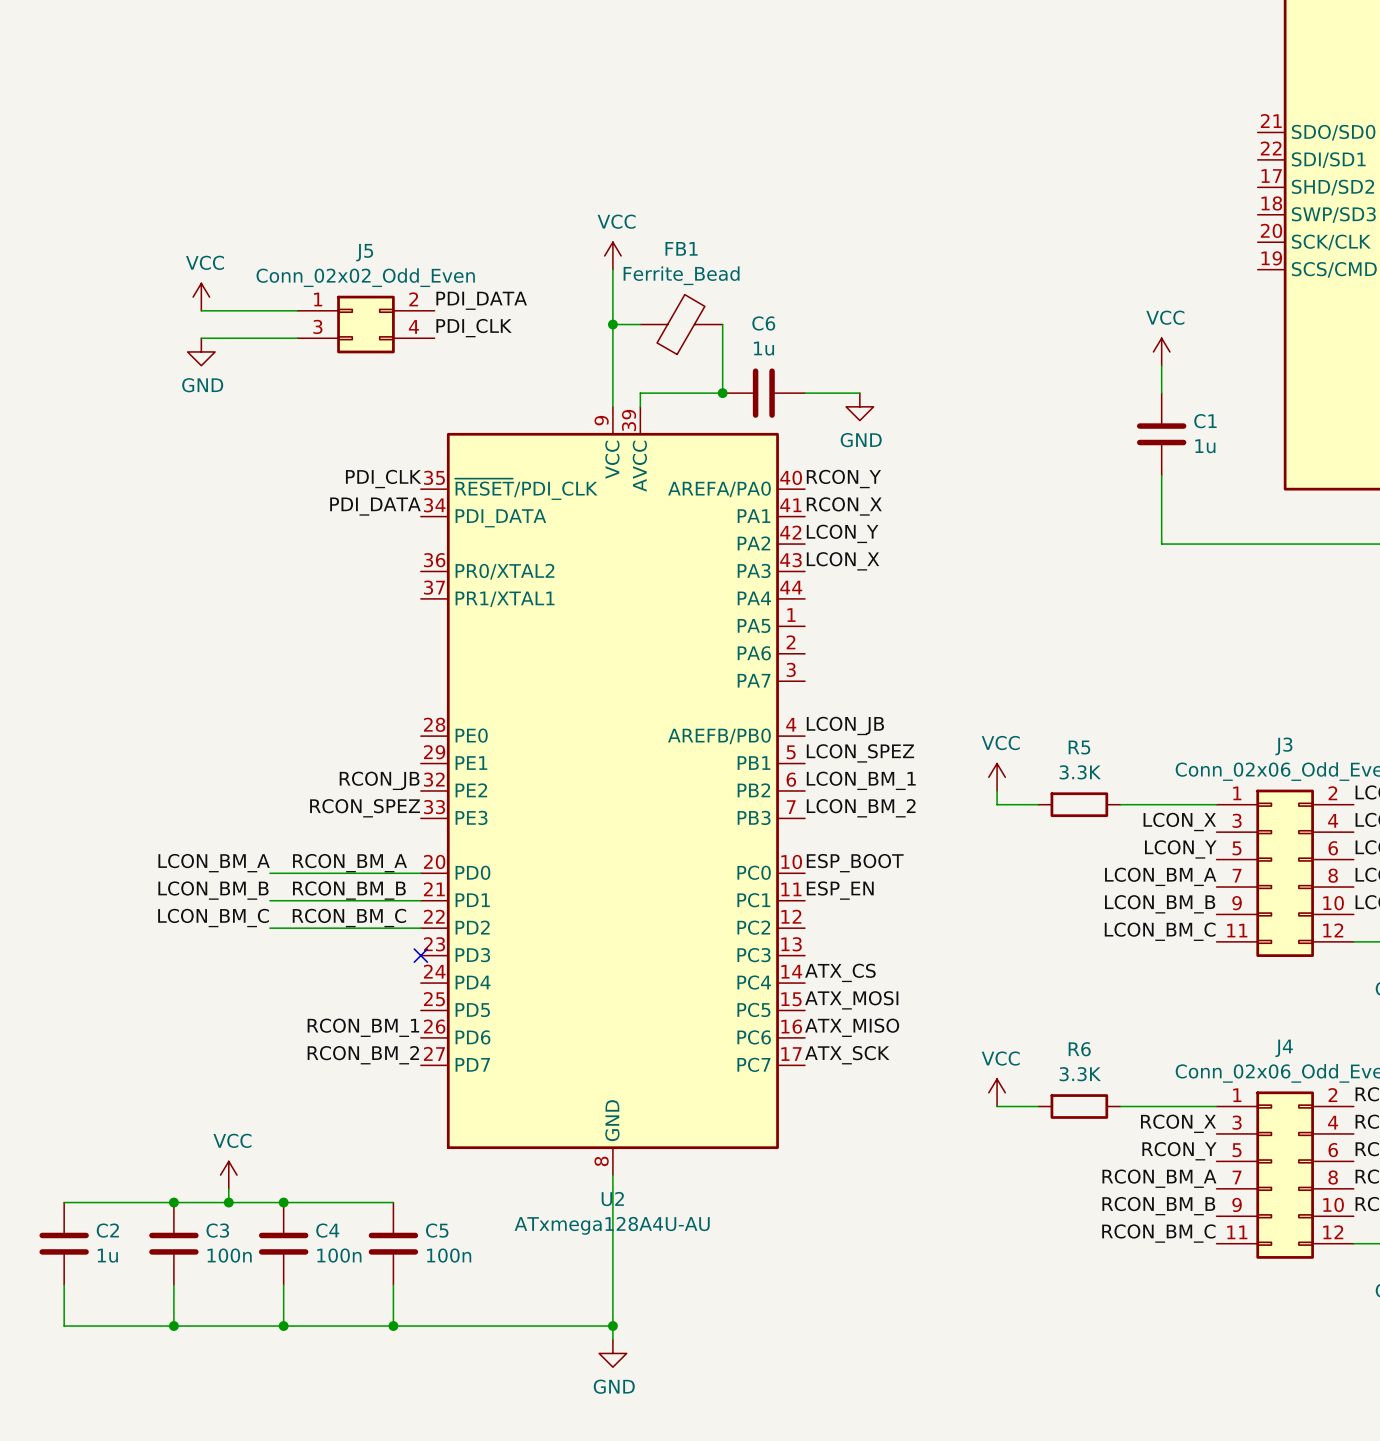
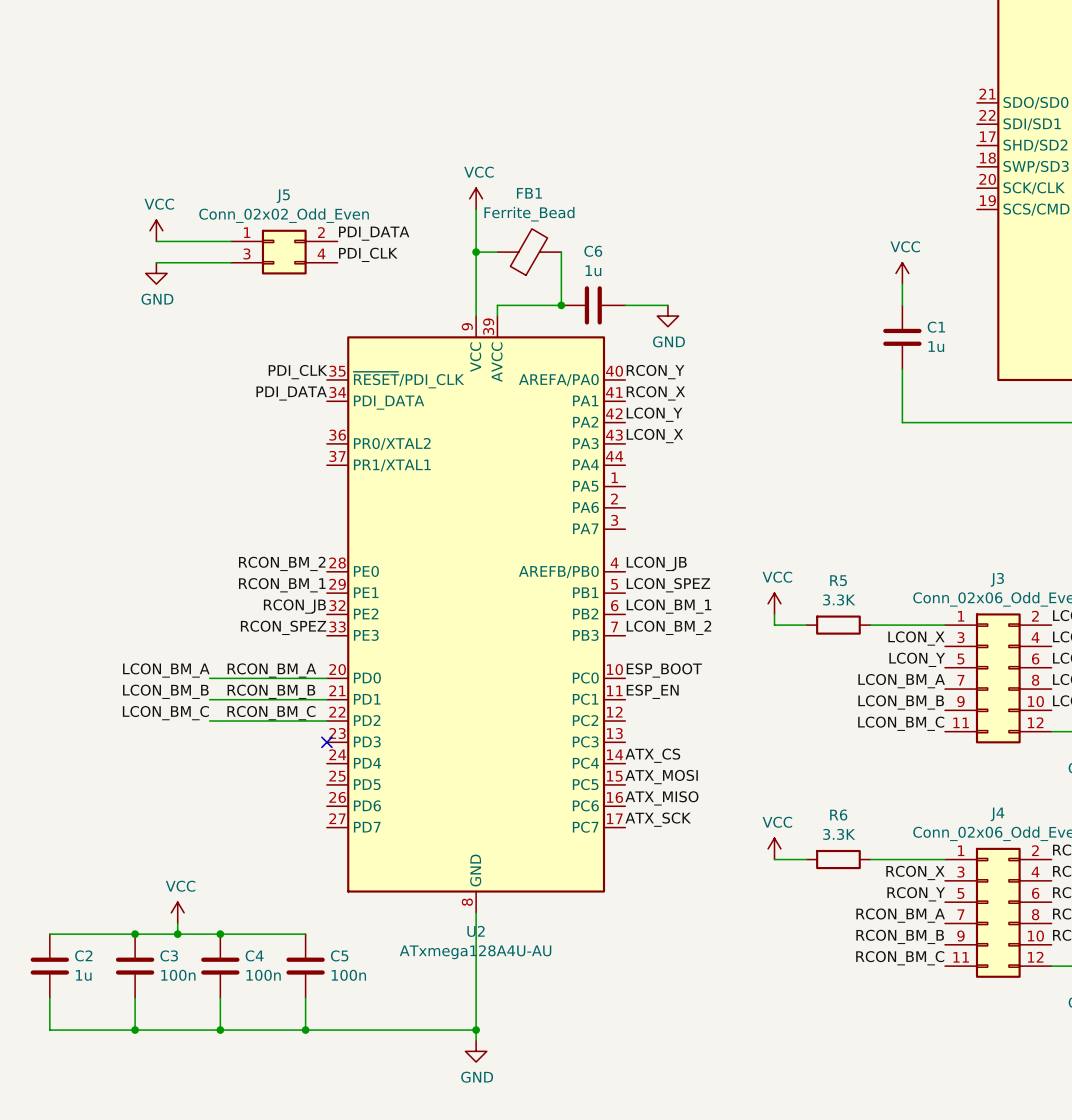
label: none -> RCON_BM_2 (282, 563)
label: none -> RCON_BM_1 (282, 585)
label: RCON_BM_1 (363, 1027) -> none
label: RCON_BM_2 (363, 1055) -> none

